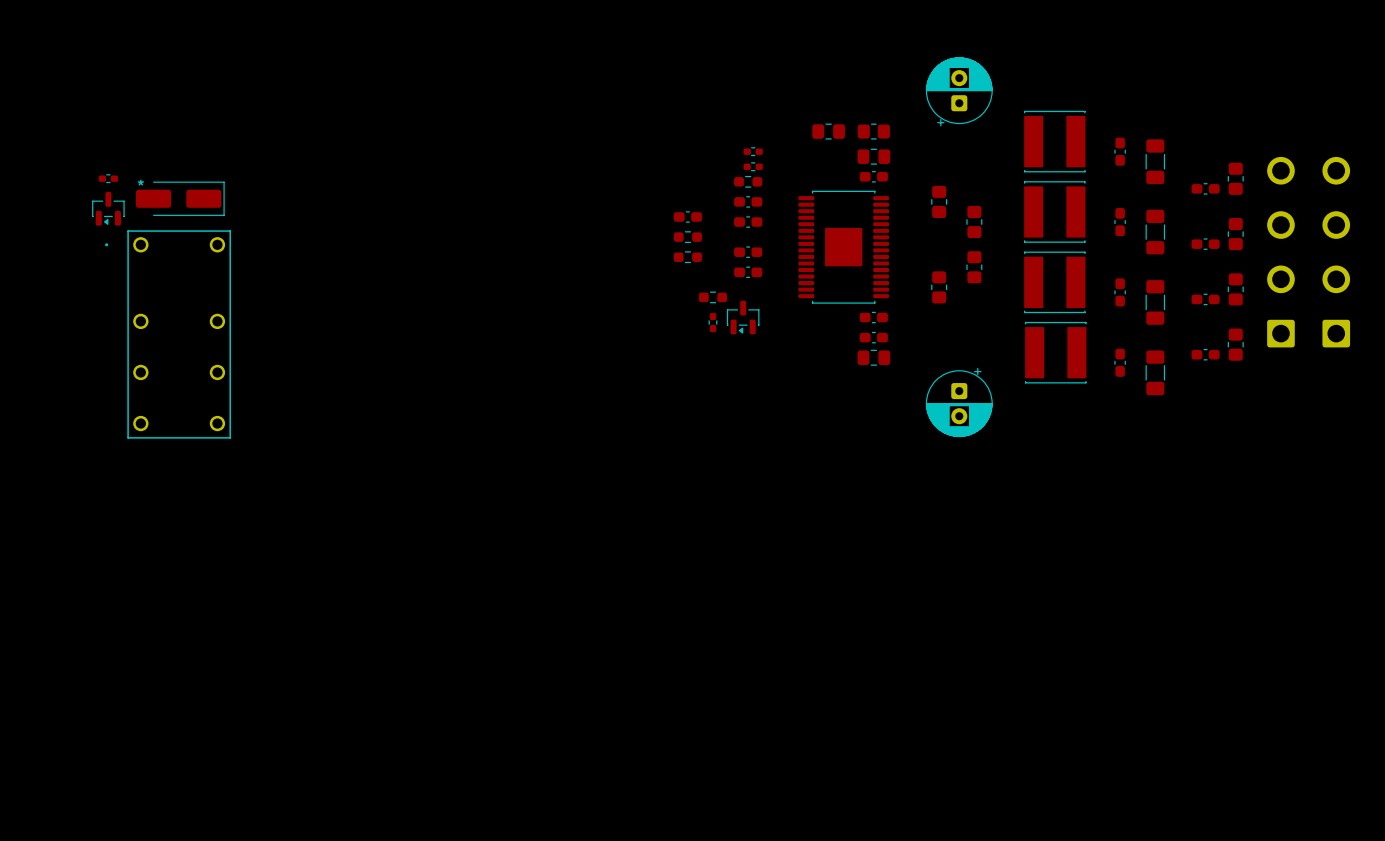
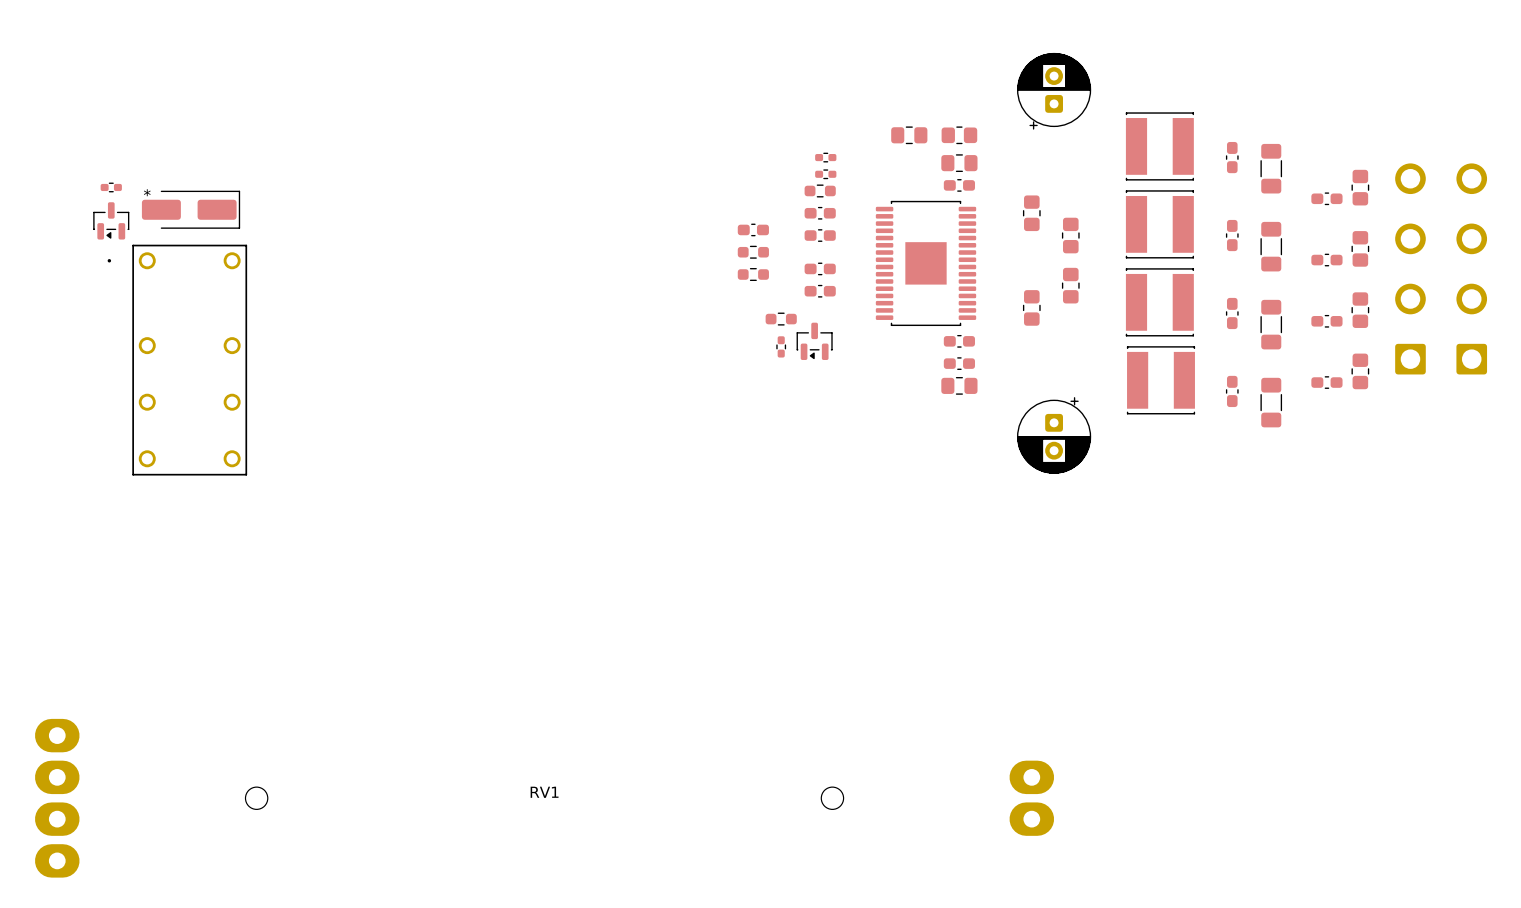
RV1: none -> (544, 798)

